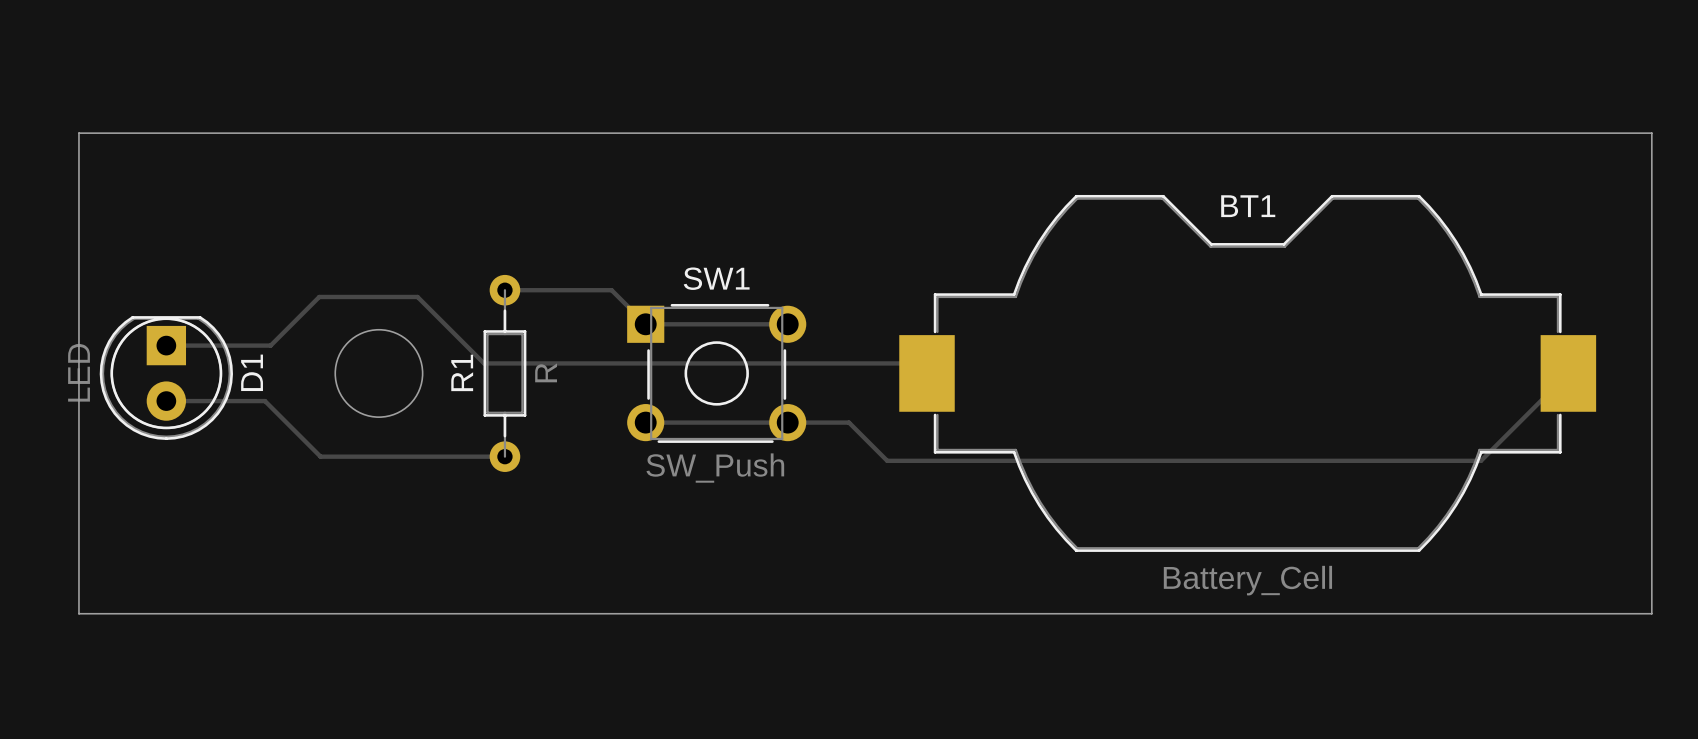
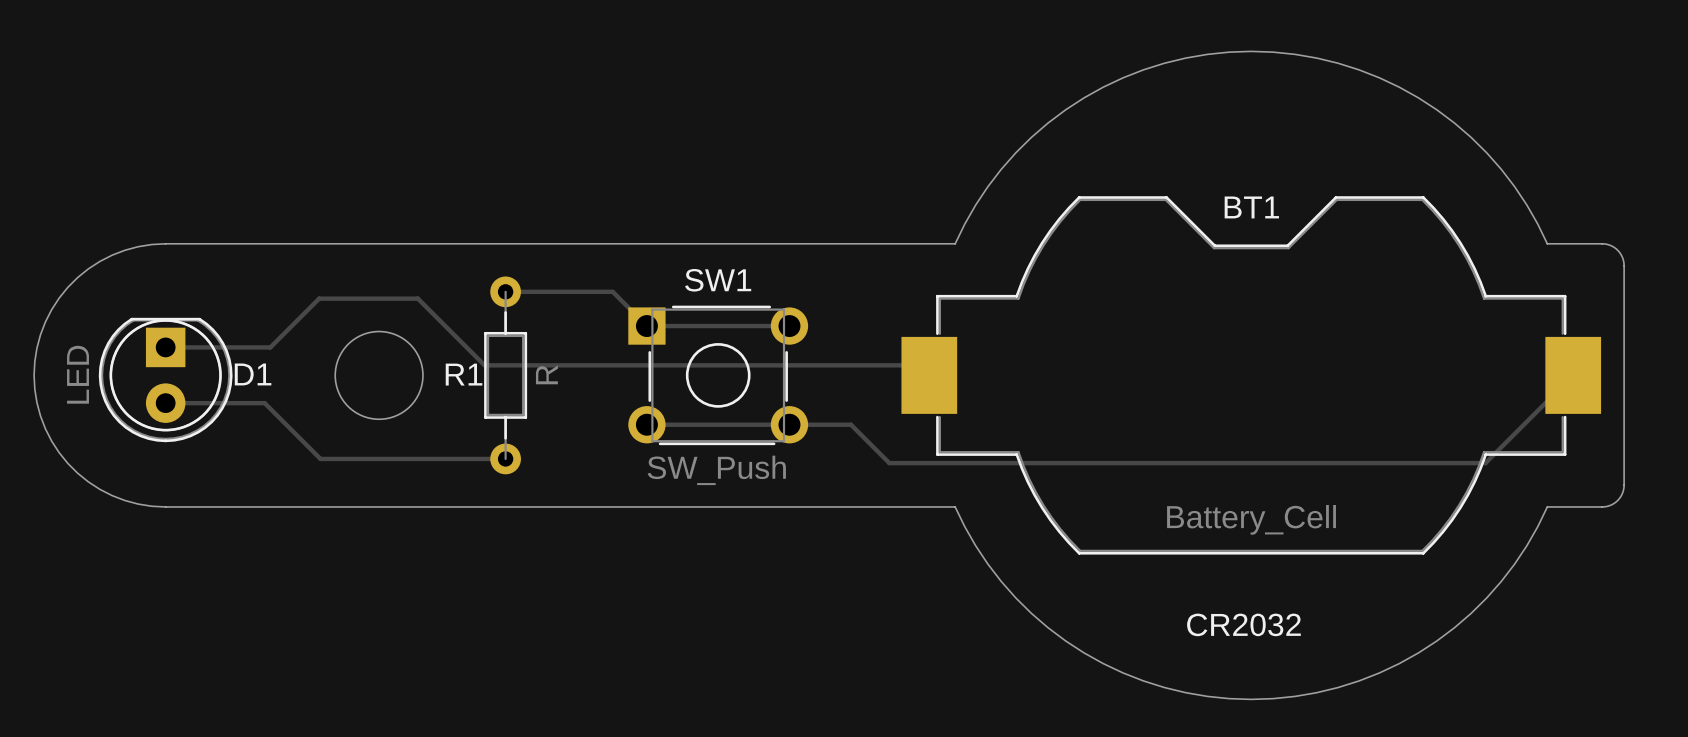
board edge: (78, 133) (1651, 133) (1651, 613) (78, 613) (78, 133) -> (165, 243) (125, 250) (88, 268) (67, 287) (51, 309) (36, 348) (34, 389) (45, 428) (67, 463) (88, 481) (112, 495) (138, 504) (165, 506) (955, 506) (975, 545) (1001, 581) (1031, 613) (1065, 640) (1123, 672) (1164, 687) (1207, 696) (1251, 699) (1316, 692) (1359, 680) (1399, 663) (1454, 627) (1486, 597) (1514, 564) (1547, 506) (1607, 506) (1619, 498) (1623, 487) (1624, 265) (1619, 252) (1611, 245) (1604, 243) (1547, 243) (1526, 204) (1501, 169) (1454, 123) (1418, 97) (1379, 77) (1338, 63) (1295, 54) (1251, 51) (1207, 54) (1143, 69) (1103, 87) (1065, 109) (1015, 152) (975, 204) (955, 243) (165, 243)
D1 name rotation: 0° (252, 372) -> 90° clockwise (253, 374)
R1 name rotation: 0° (462, 372) -> 90° clockwise (464, 374)
BT1 value position: Battery_Cell (1247, 580) -> Battery_Cell (1251, 519)
text: none -> CR2032 (1243, 624)

